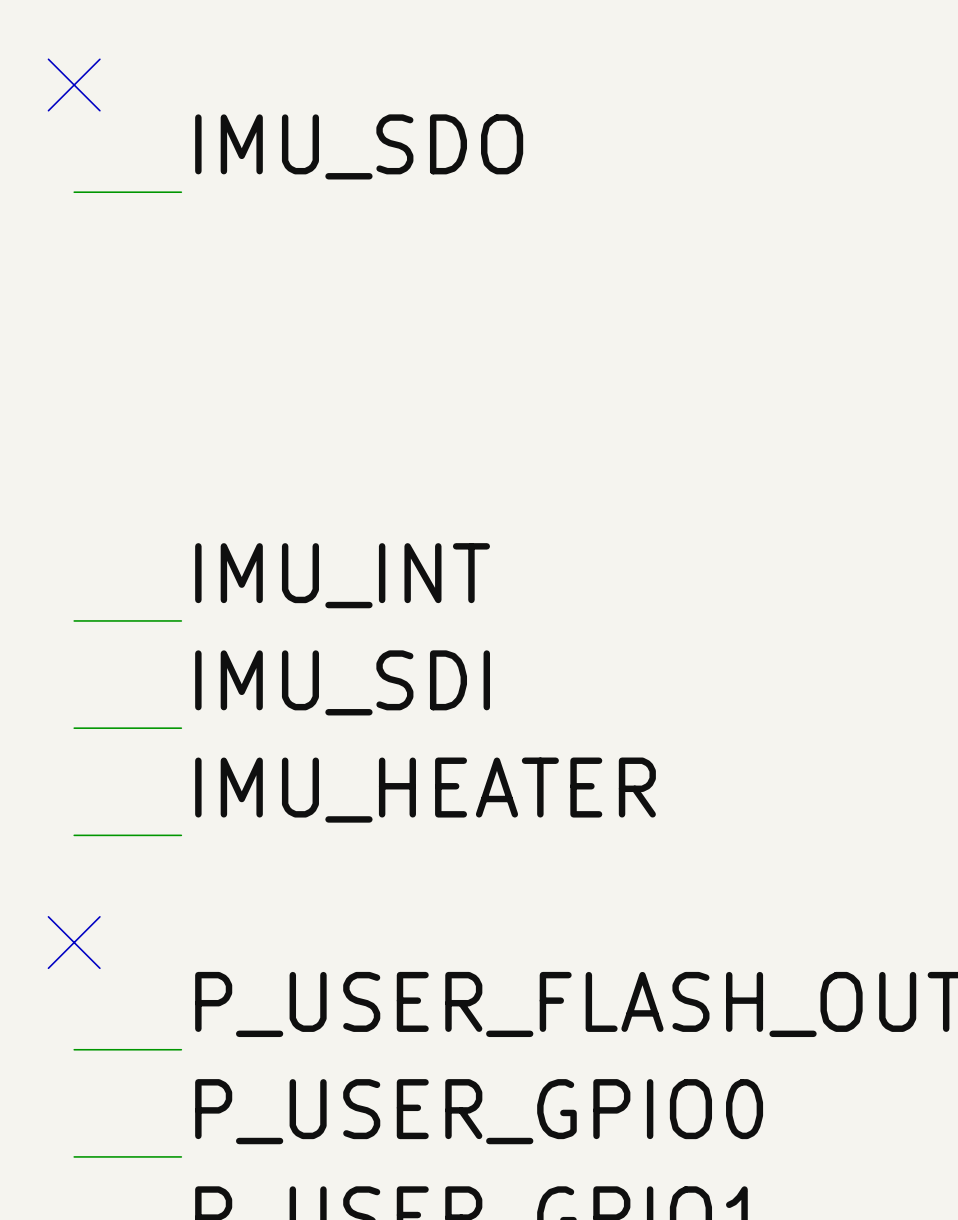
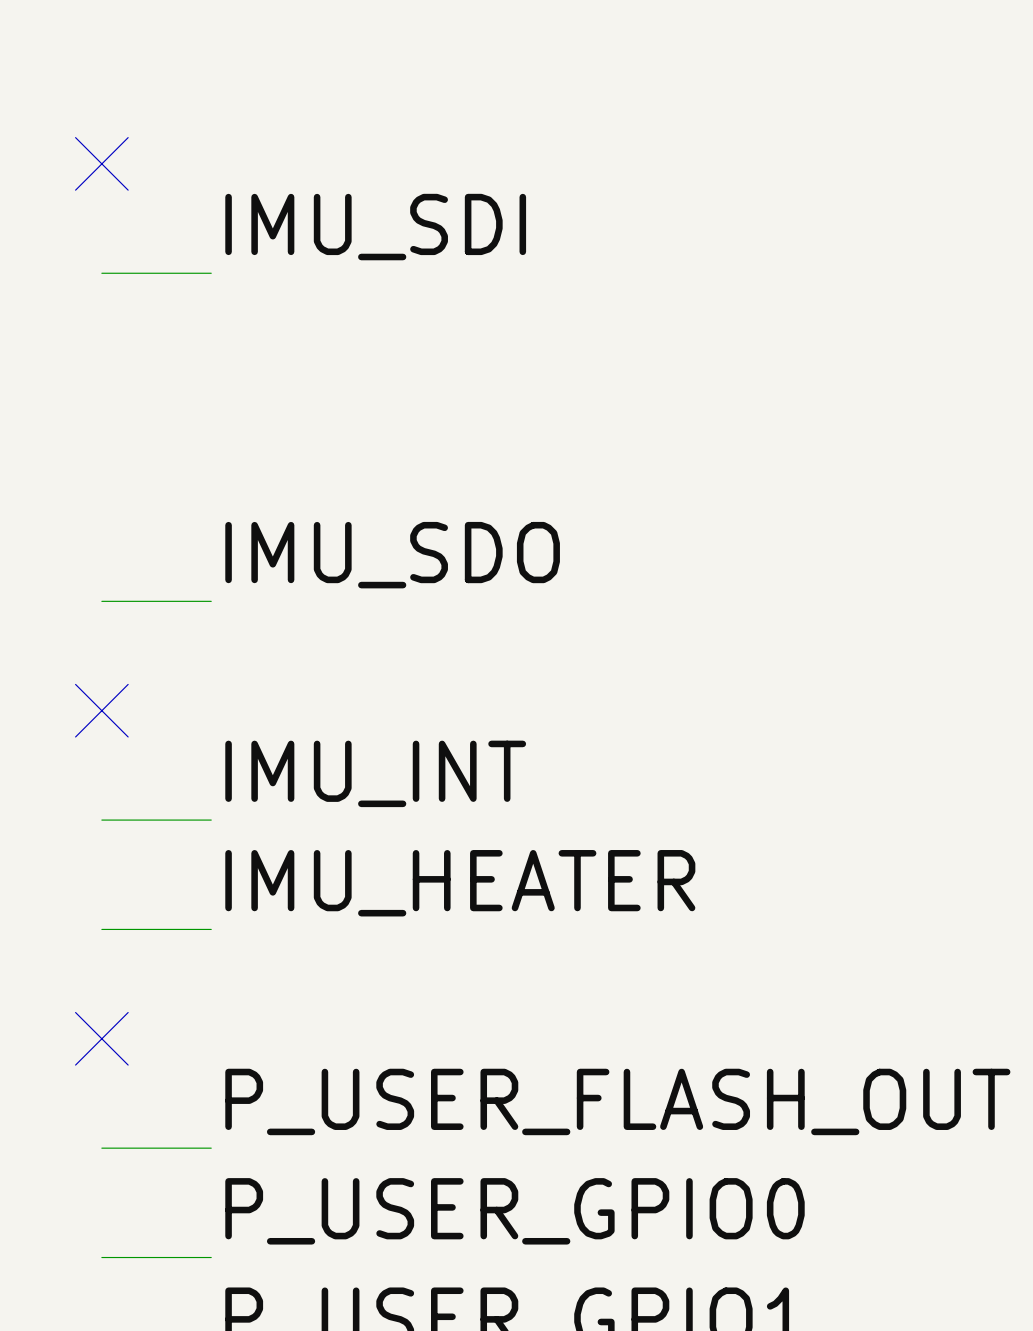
label: IMU_SDO (359, 146) -> IMU_SDI (375, 227)
label: none -> IMU_SDO (392, 555)
label: IMU_INT (342, 575) -> none
wire: (74, 620) (181, 620) -> (101, 601) (211, 601)
no-connect mark: none -> (101, 710)
label: IMU_SDI (342, 682) -> IMU_INT (375, 773)

